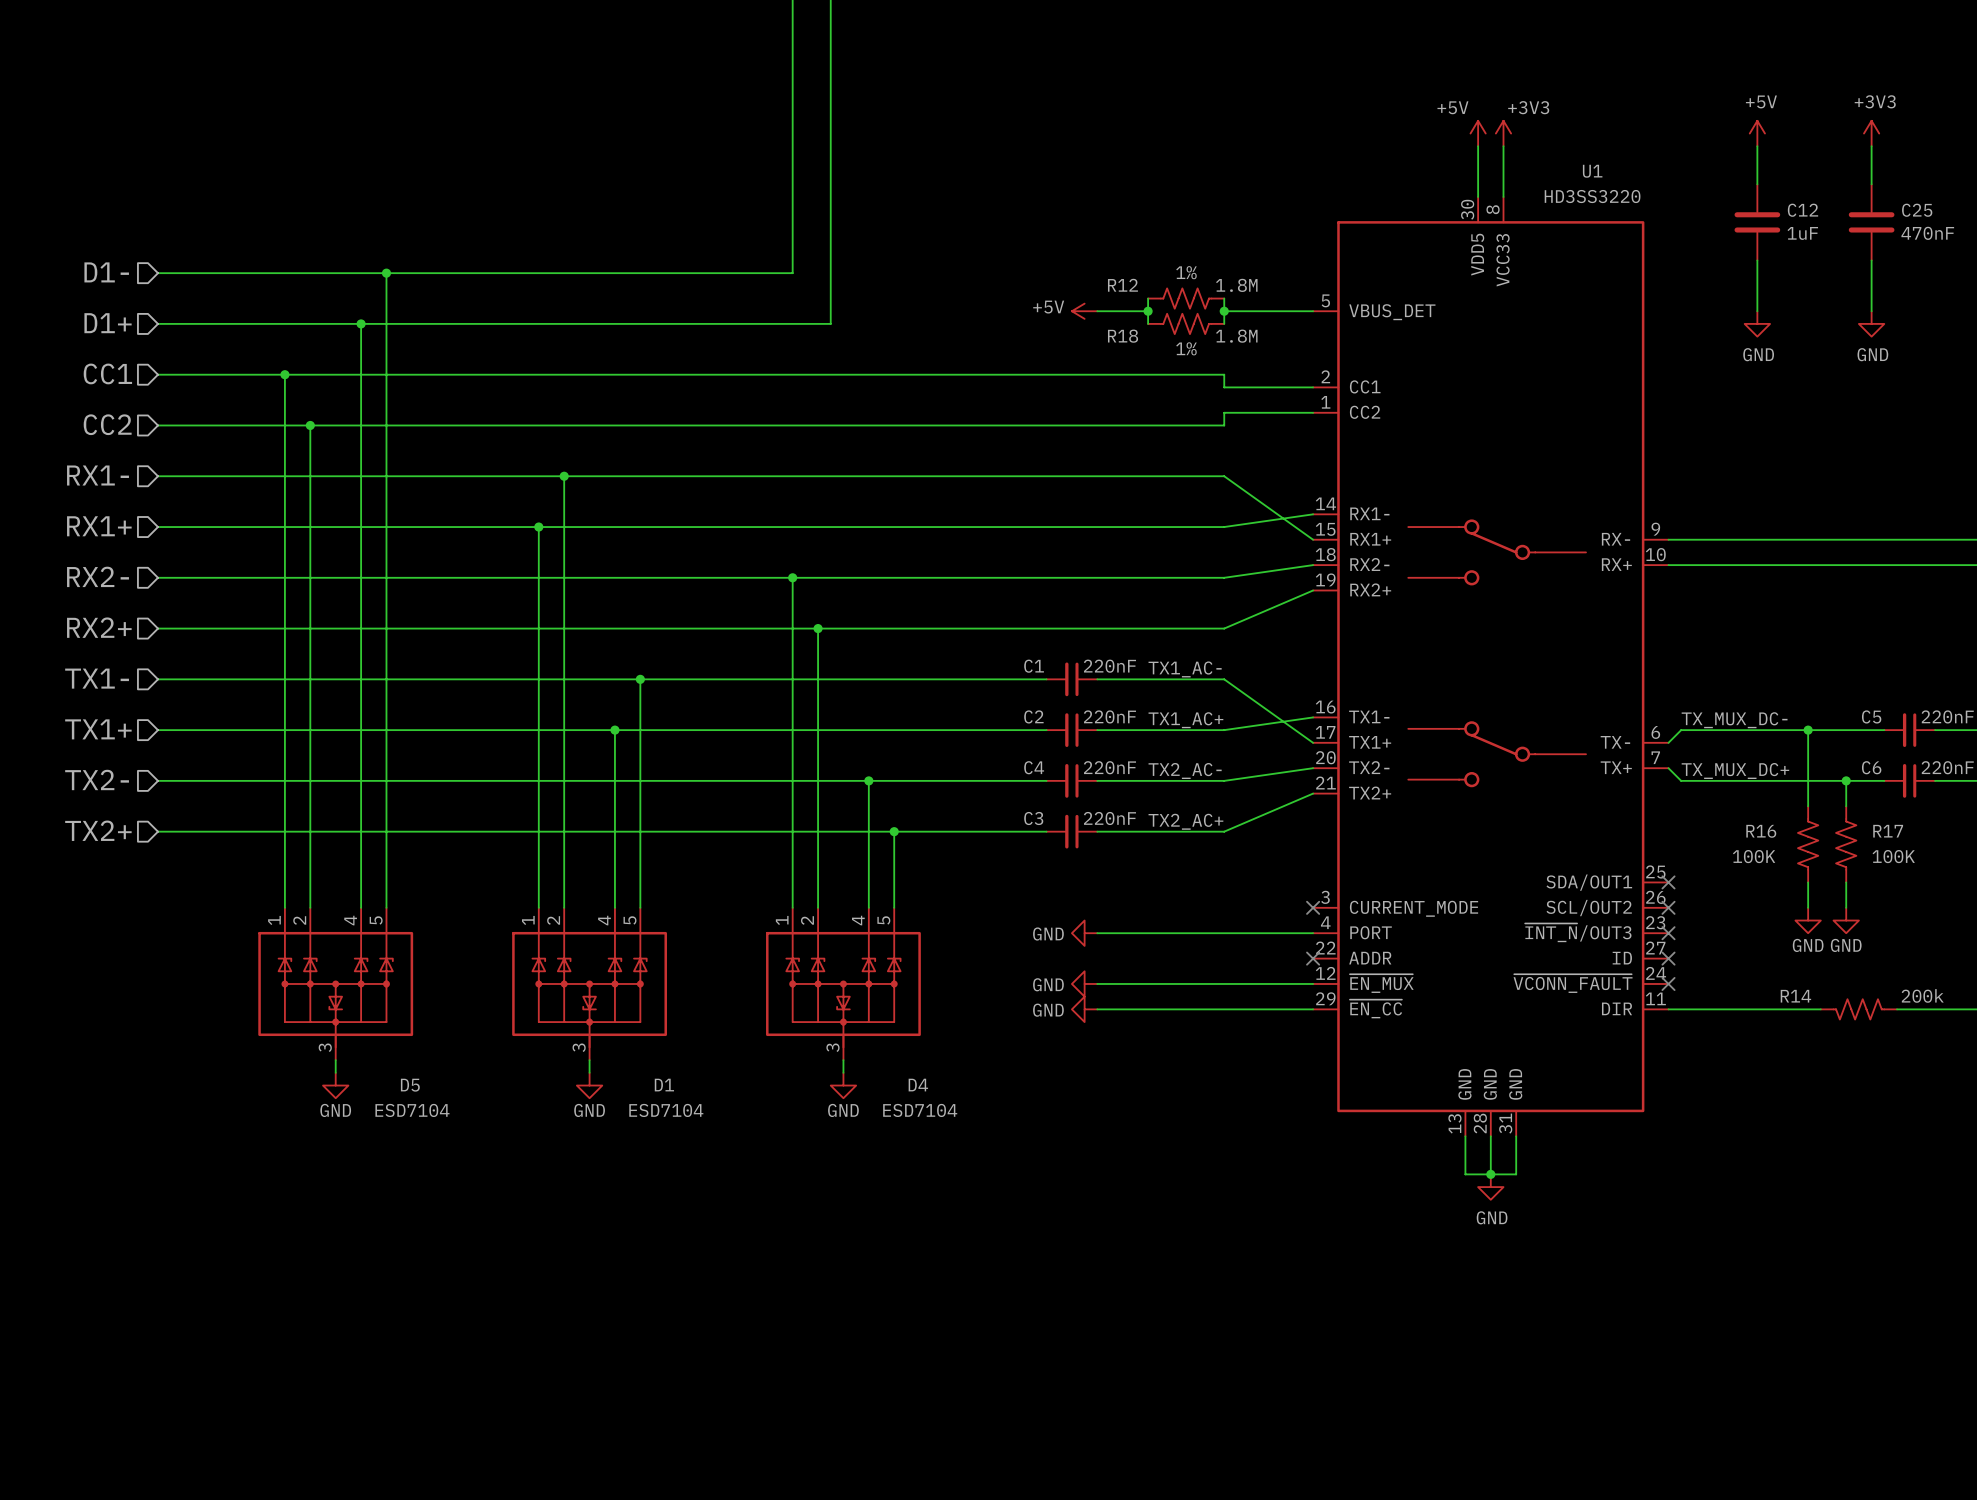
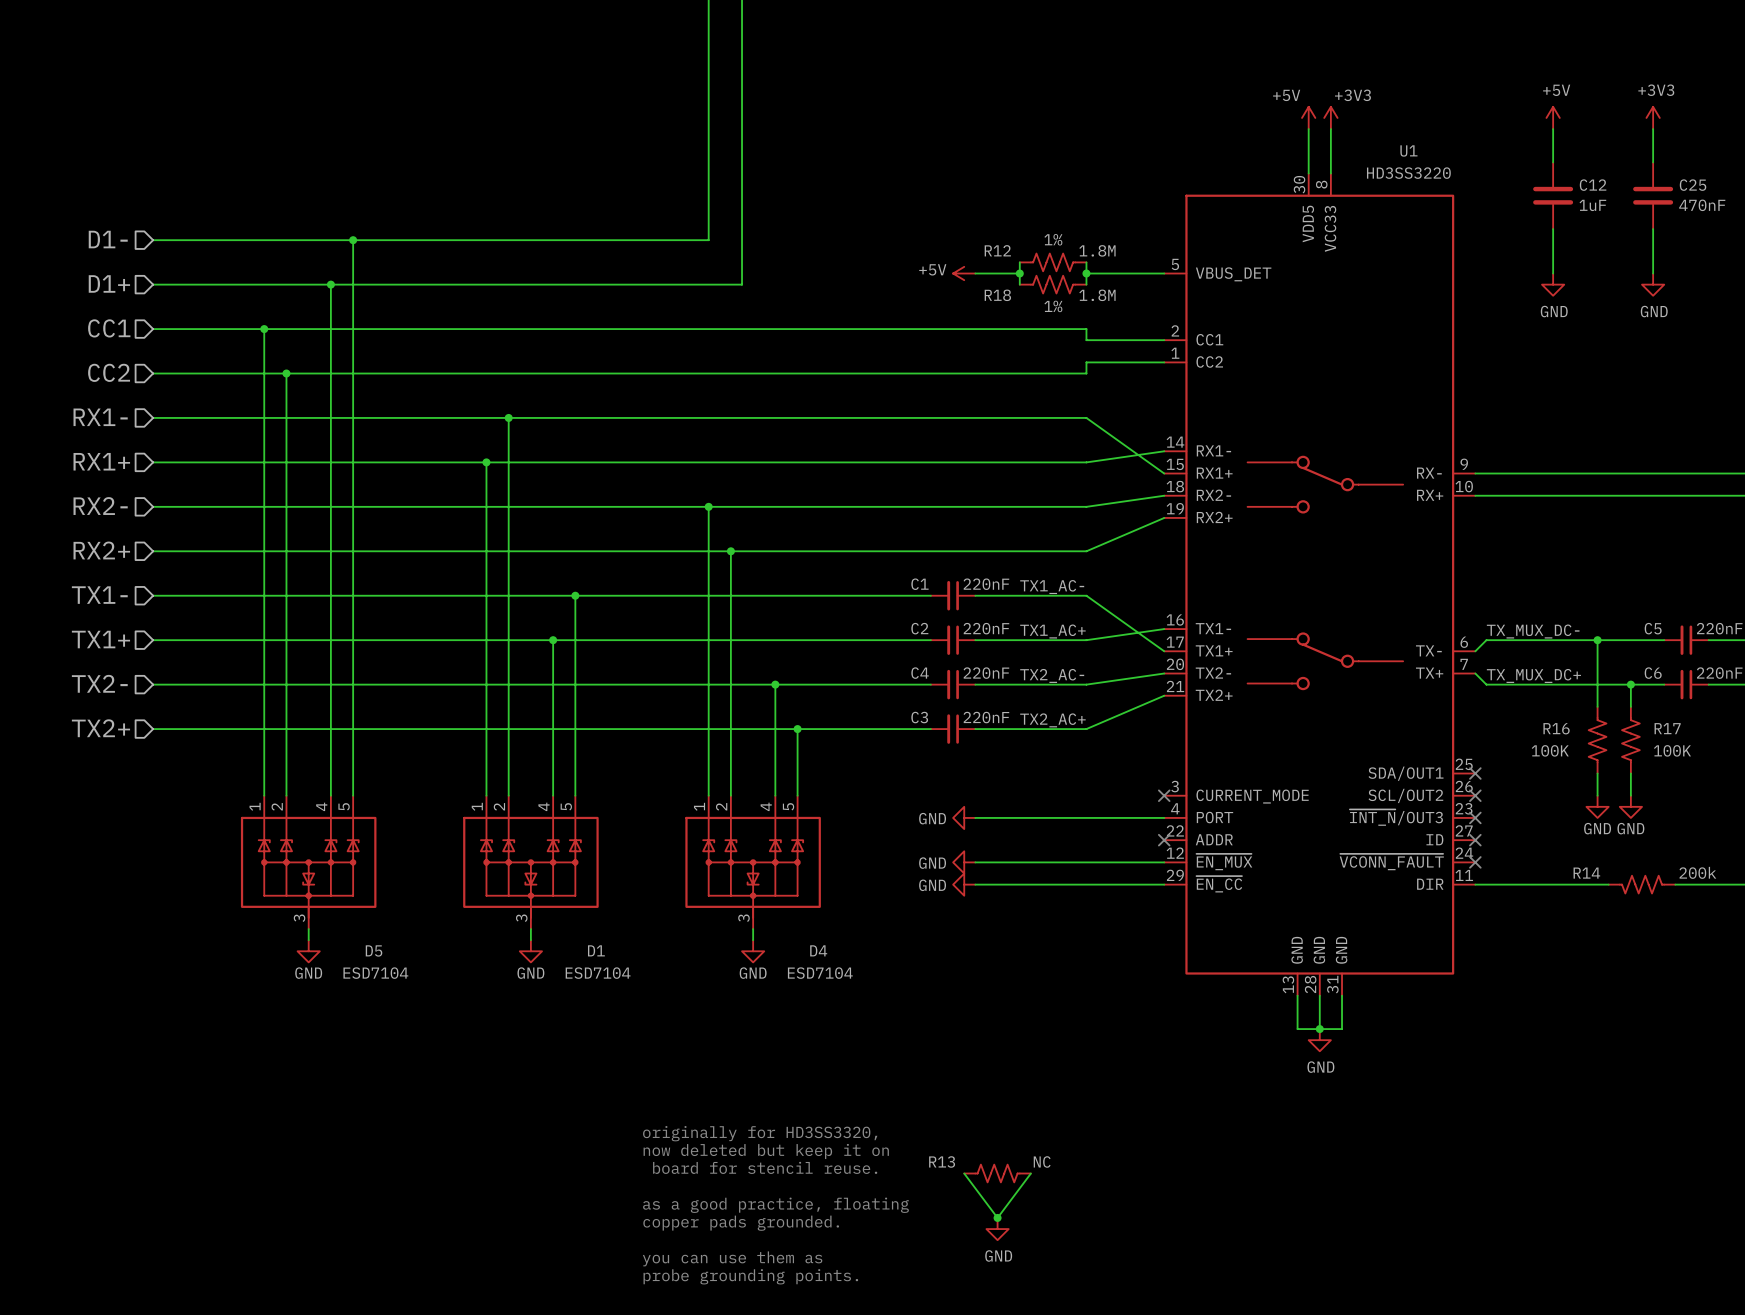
text: none -> originally for HD3SS3320, (760, 1133)
text: none -> now deleted but keep it on (766, 1151)
text: none -> board for stencil reuse. (765, 1167)
wire: none -> (964, 1173) (997, 1217) (1030, 1173)
R13: none -> NC (997, 1173)
text: none -> as a good practice, floating (775, 1205)
junction: none -> (997, 1217)
text: none -> copper pads grounded. (741, 1223)
power symbol: none -> GND (997, 1229)
text: none -> you can use them as (732, 1258)
text: none -> probe grounding points. (750, 1276)

